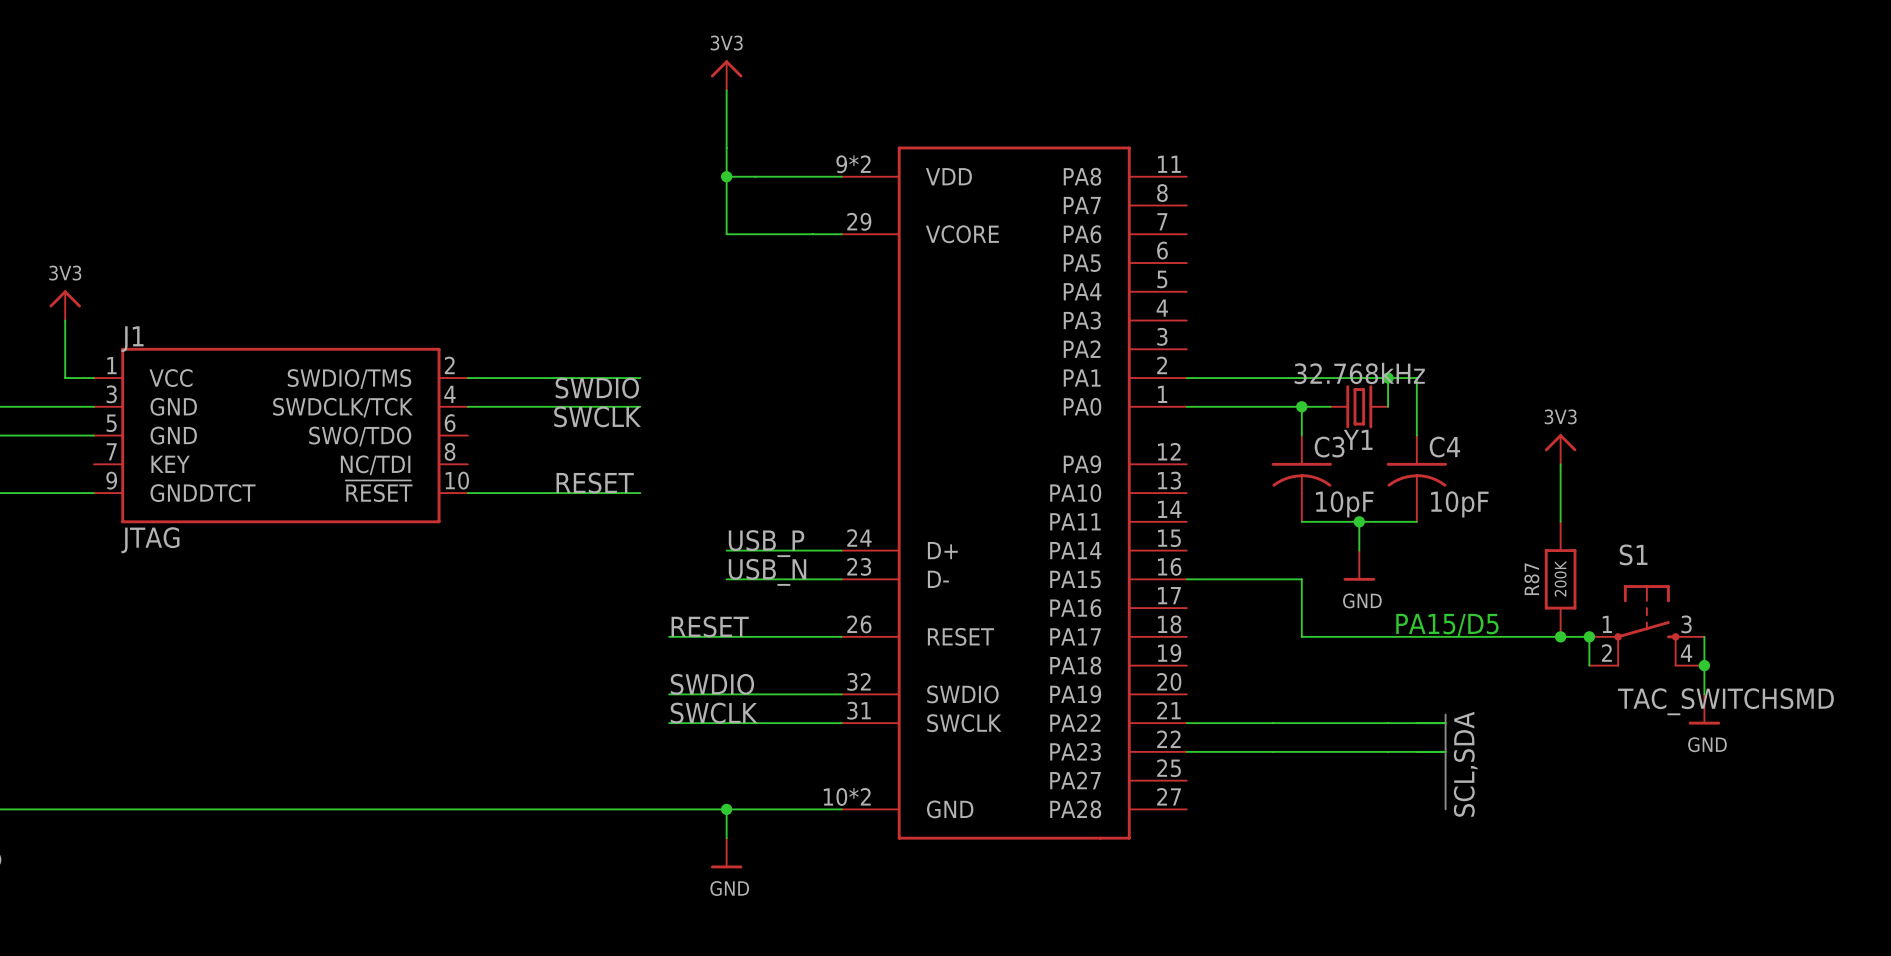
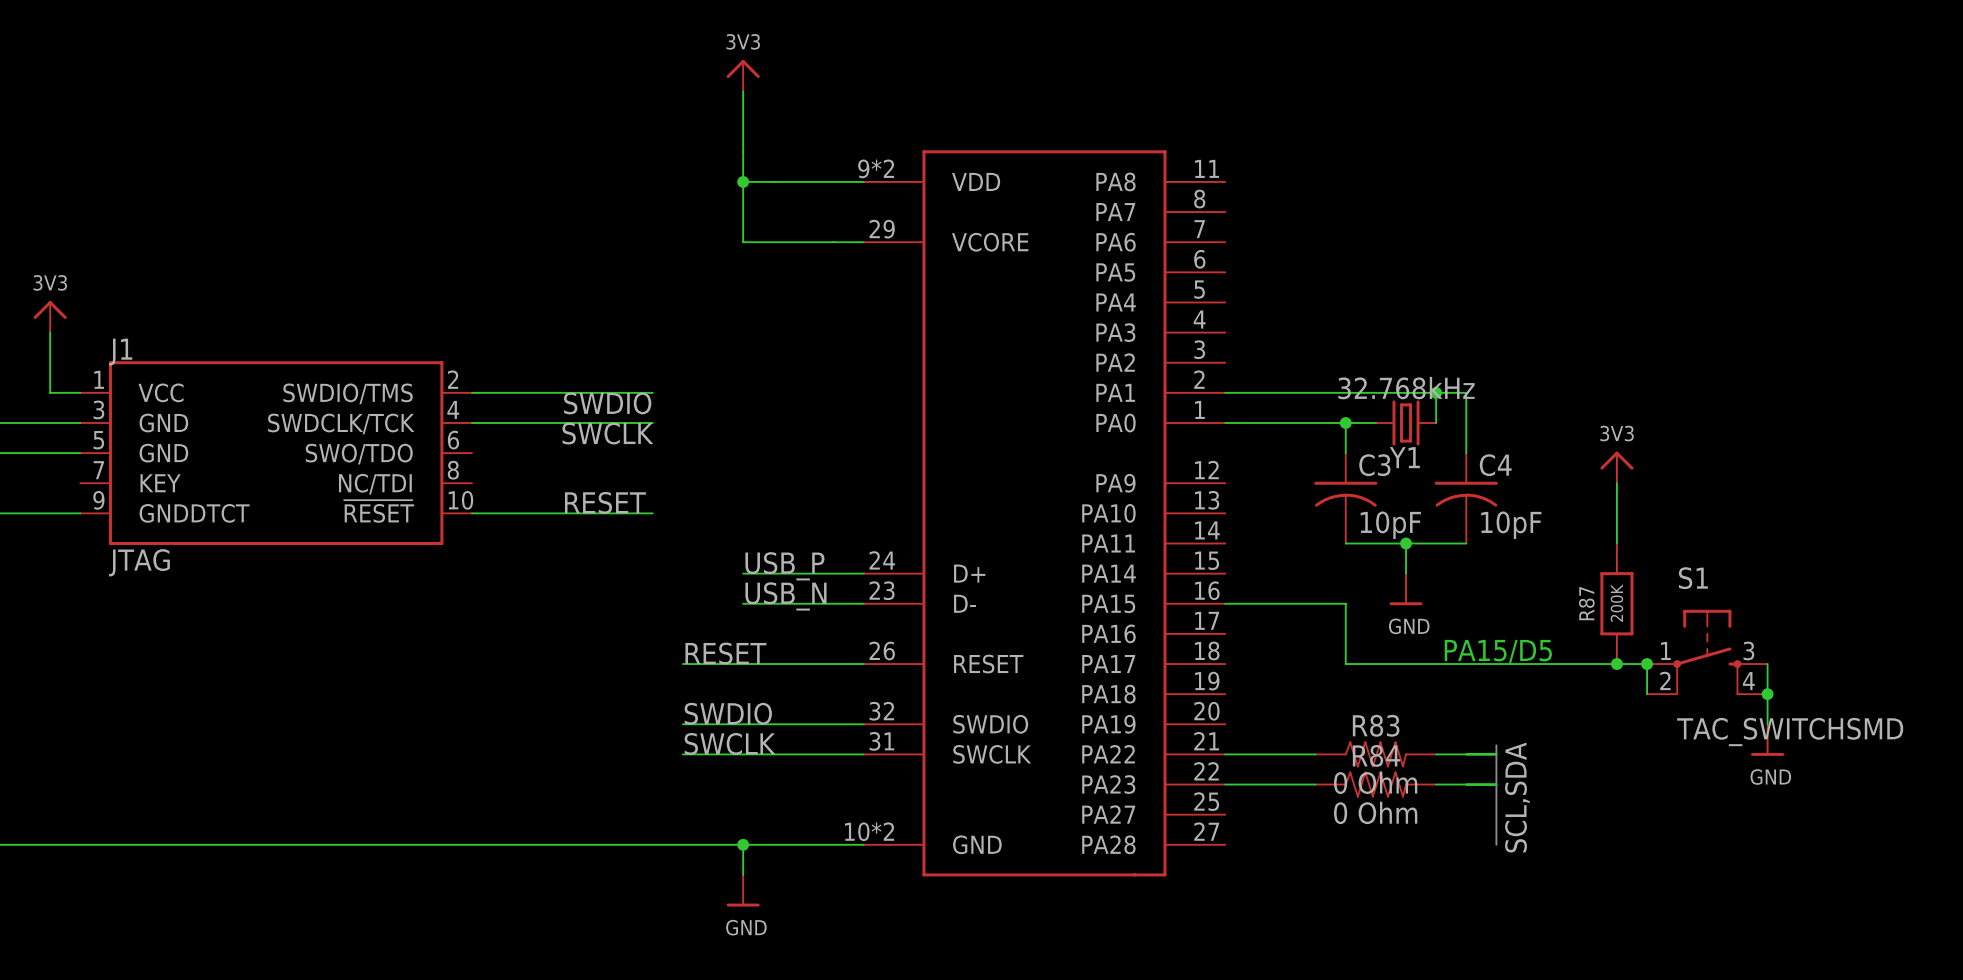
R83: none -> 0 Ohm (1375, 754)
R84: none -> 0 Ohm (1375, 784)

